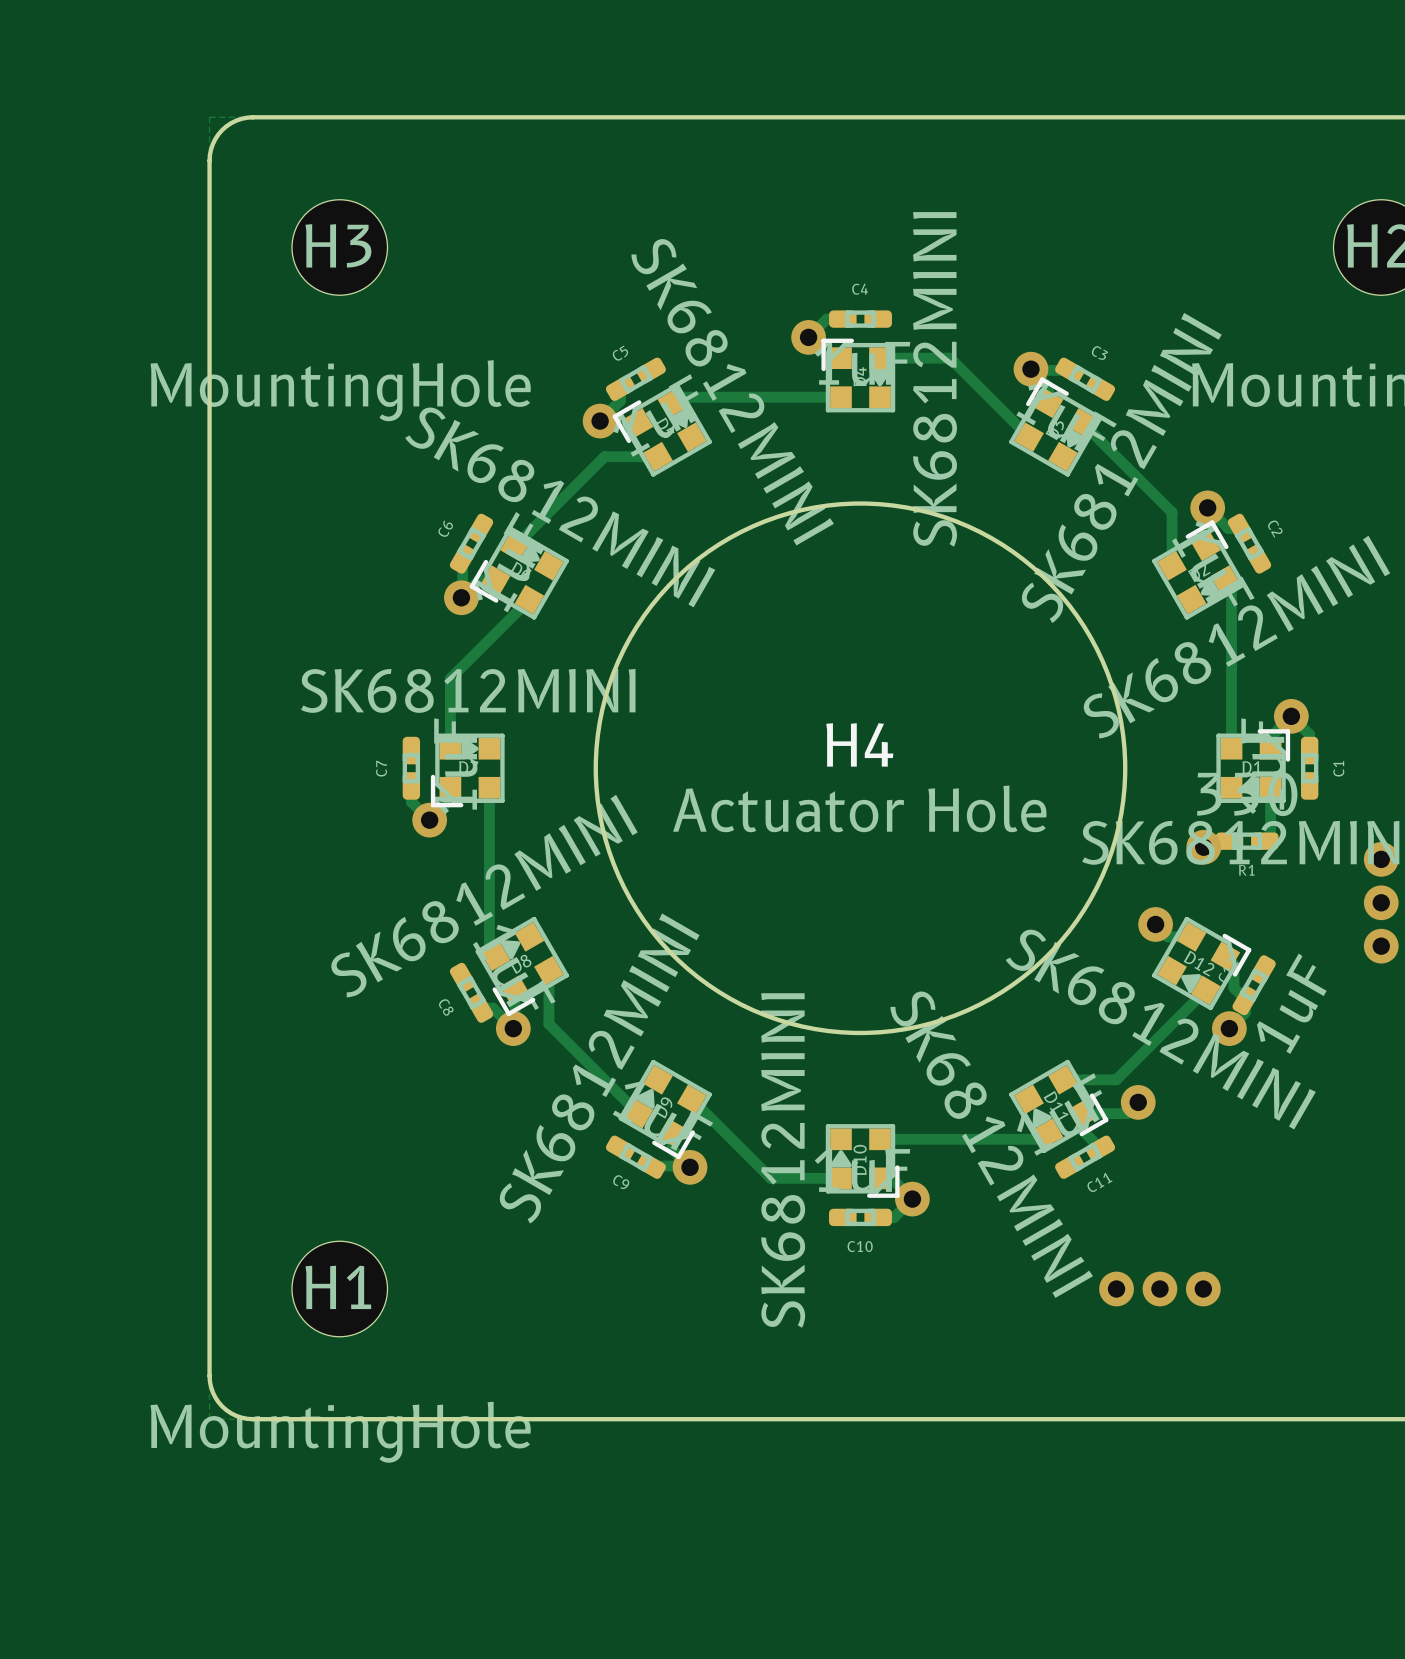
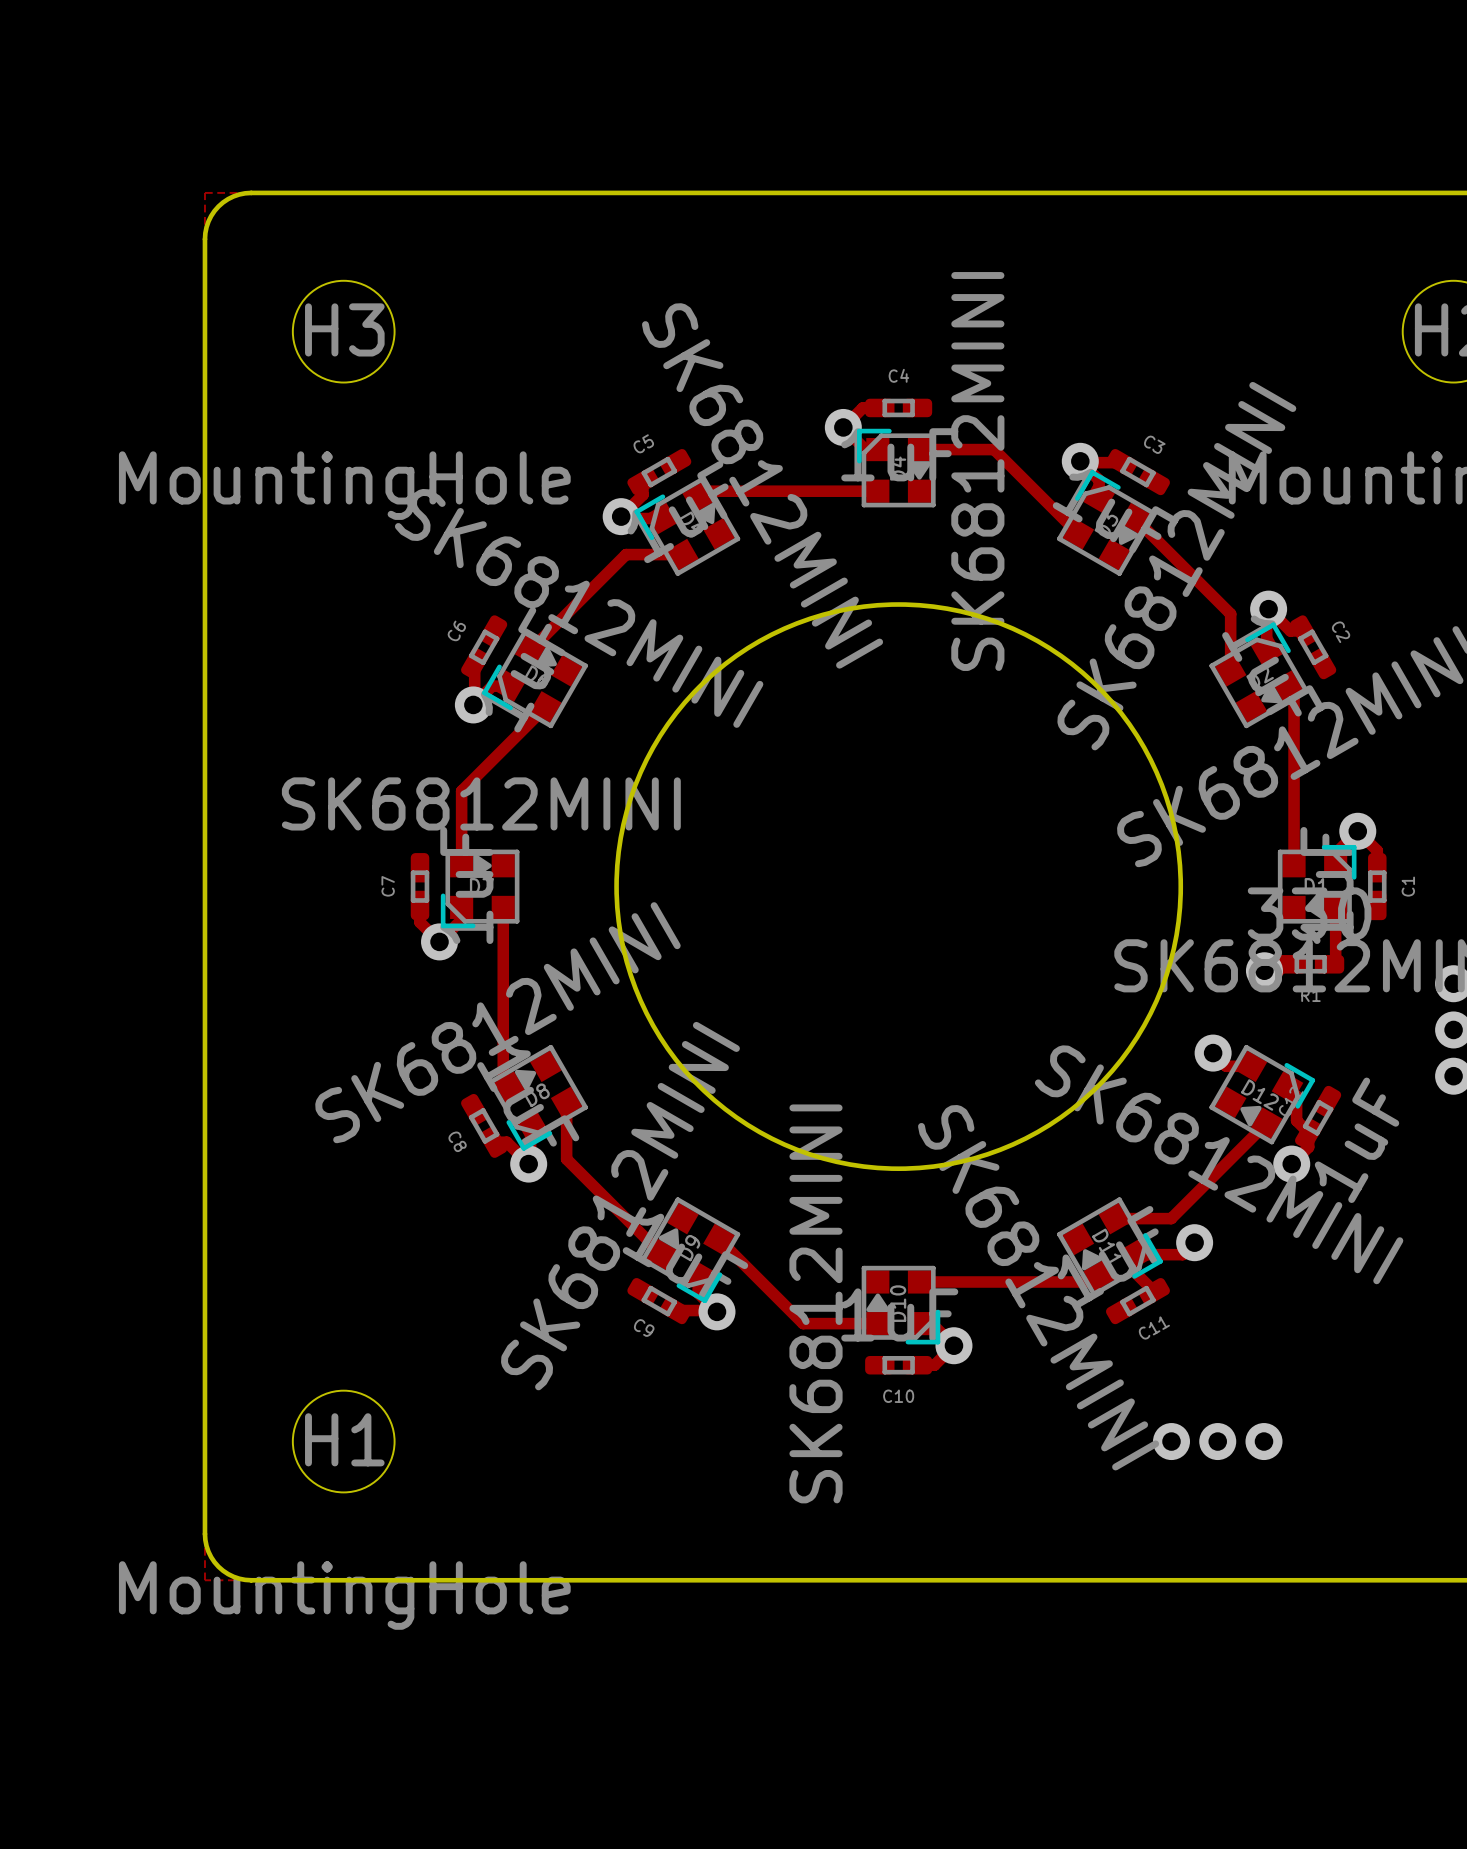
H4: Actuator Hole (859, 777) -> none

